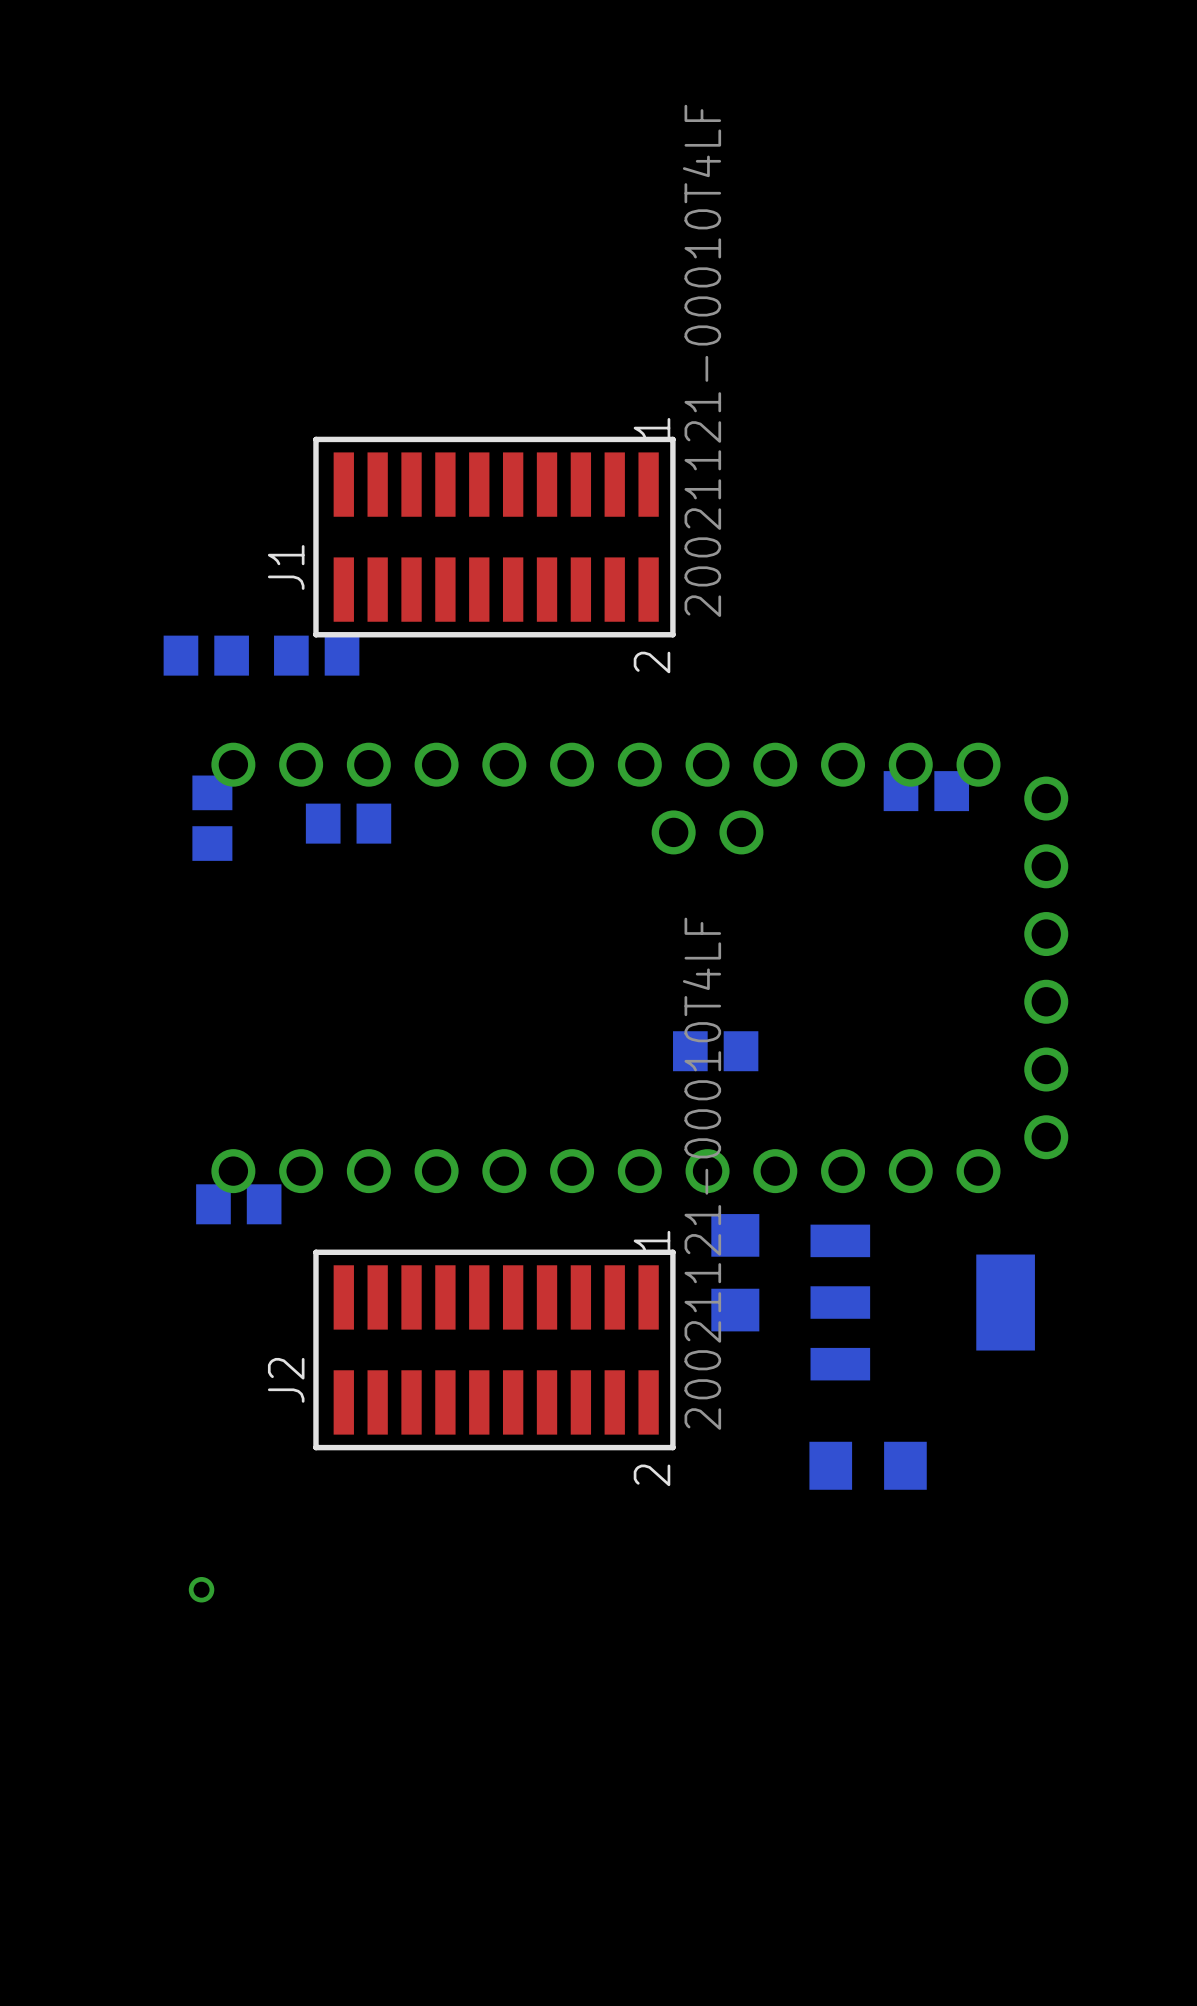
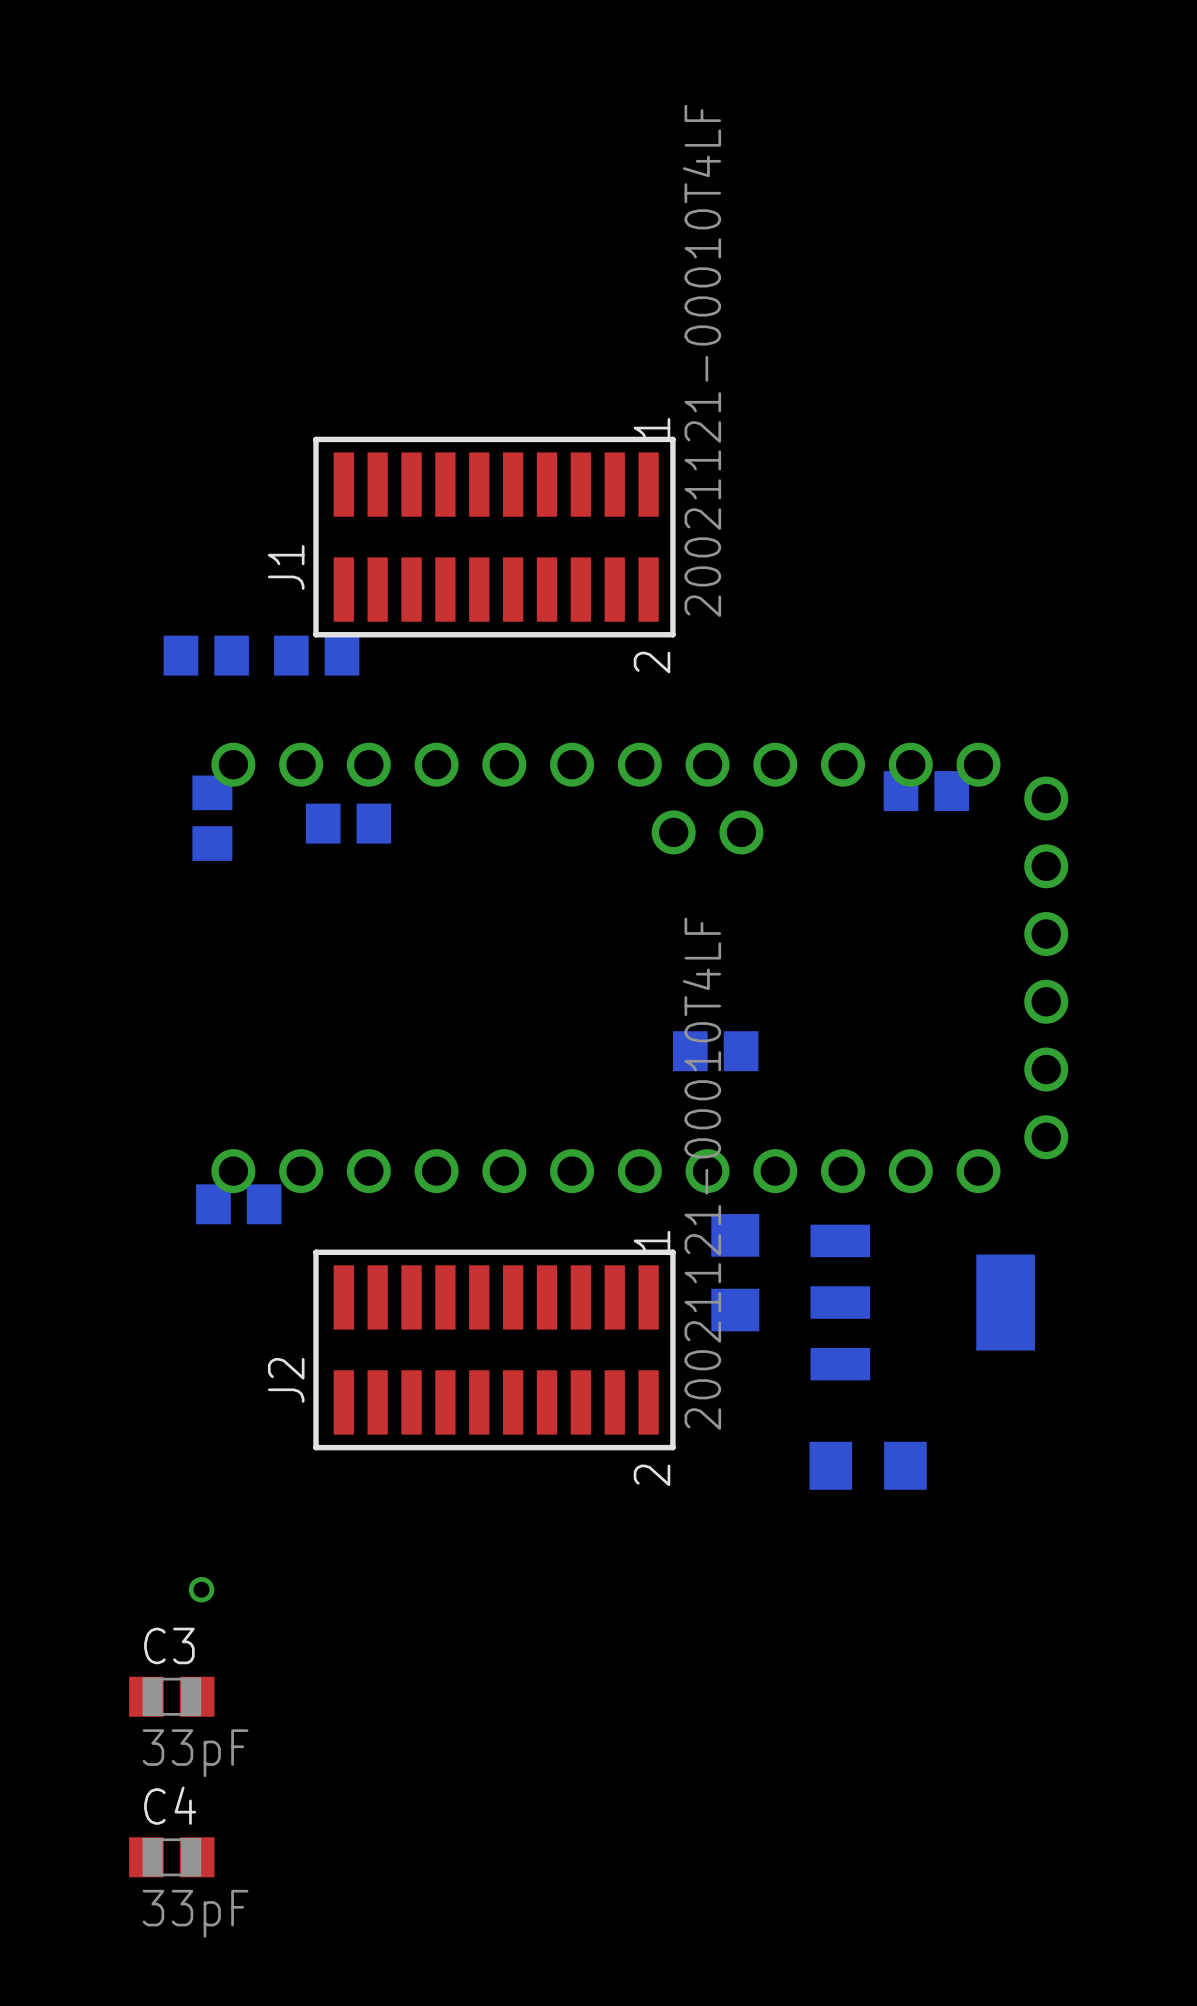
C3: none -> 33pF (171, 1696)
C4: none -> 33pF (171, 1857)

